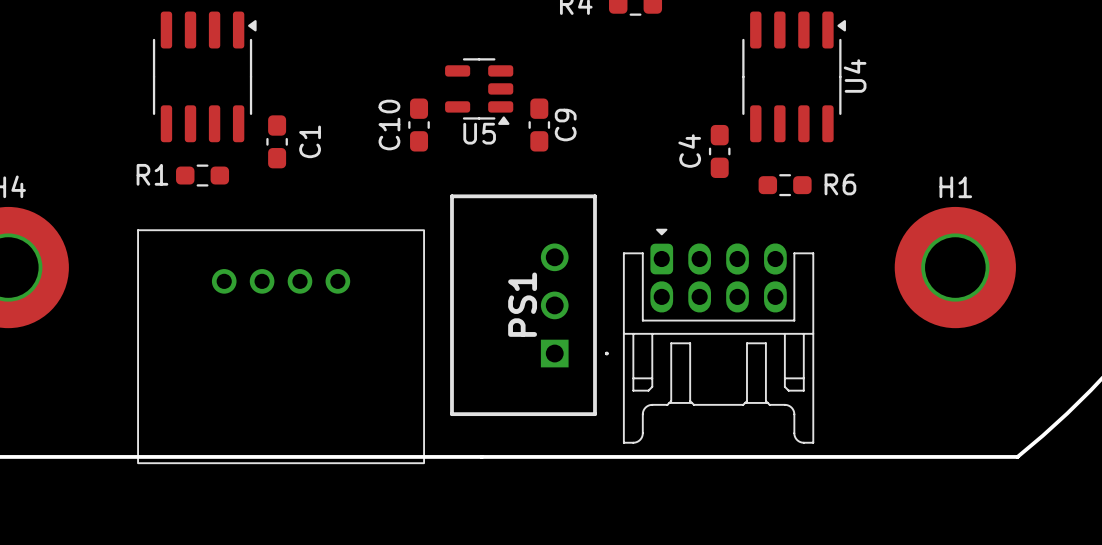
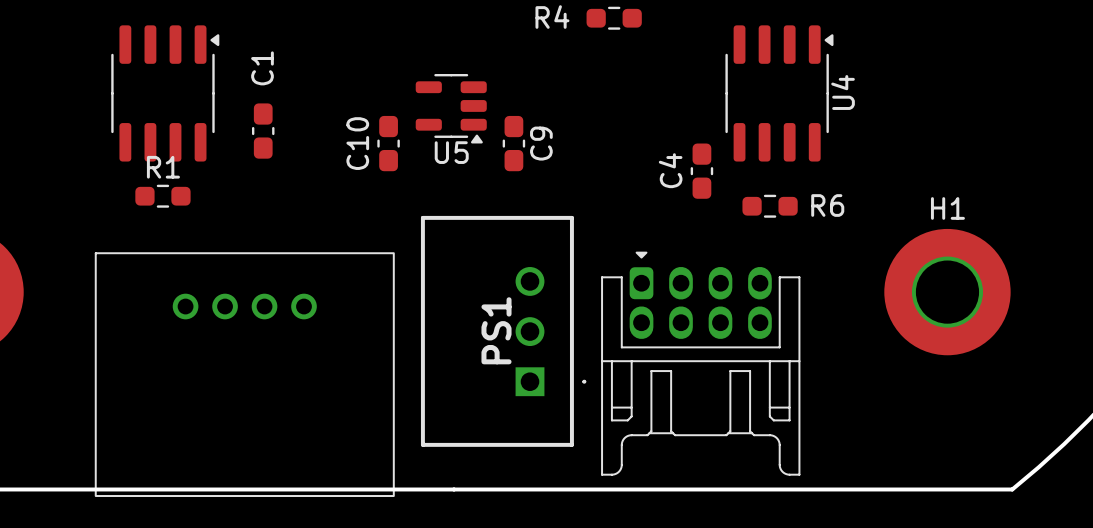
C1 position: (277, 141) -> (263, 131)
C1 name position: C1 (310, 141) -> C1 (262, 68)
R1 name position: R1 (152, 174) -> R1 (163, 167)

